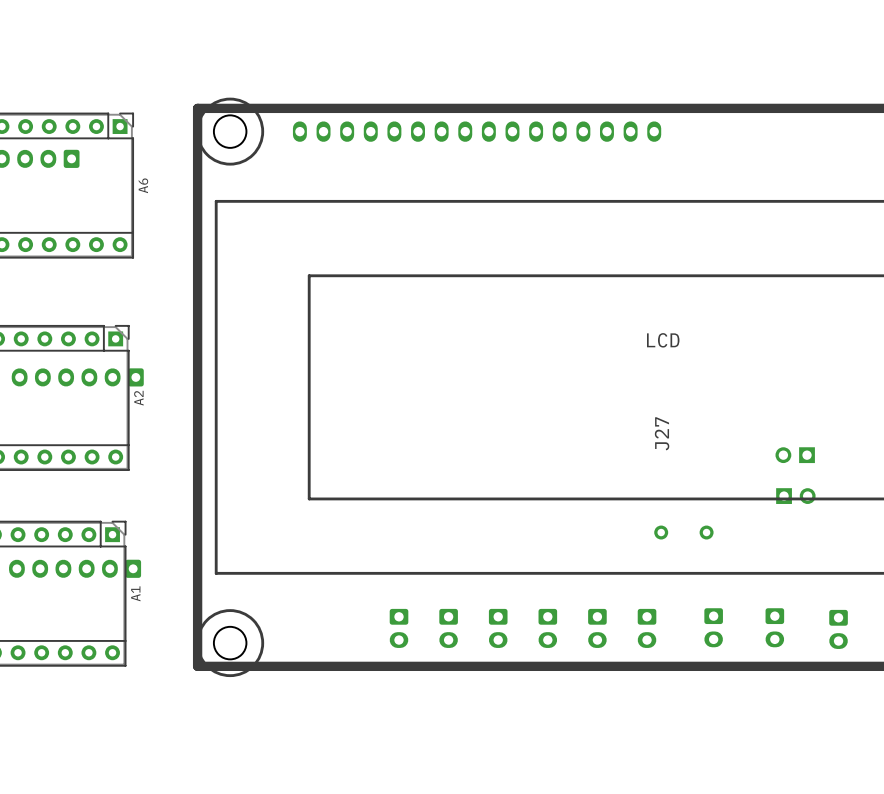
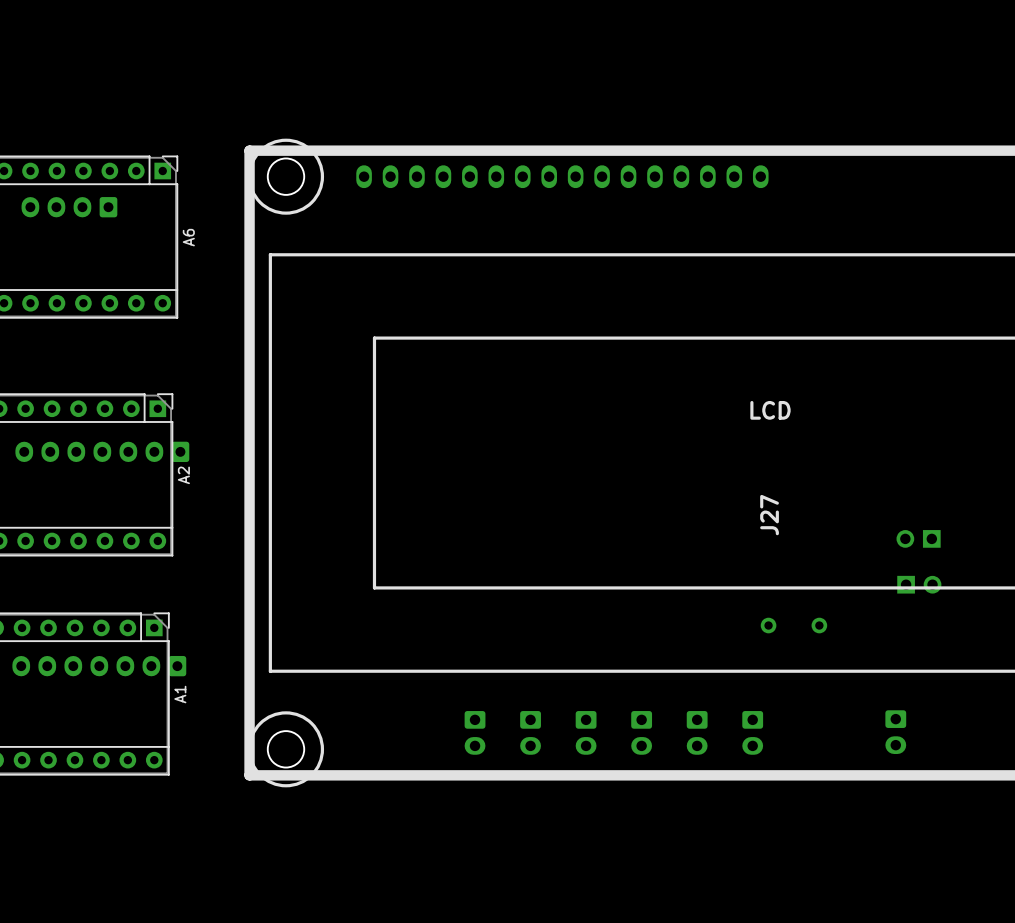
part: (713, 627) -> none
part: (838, 629) -> none

